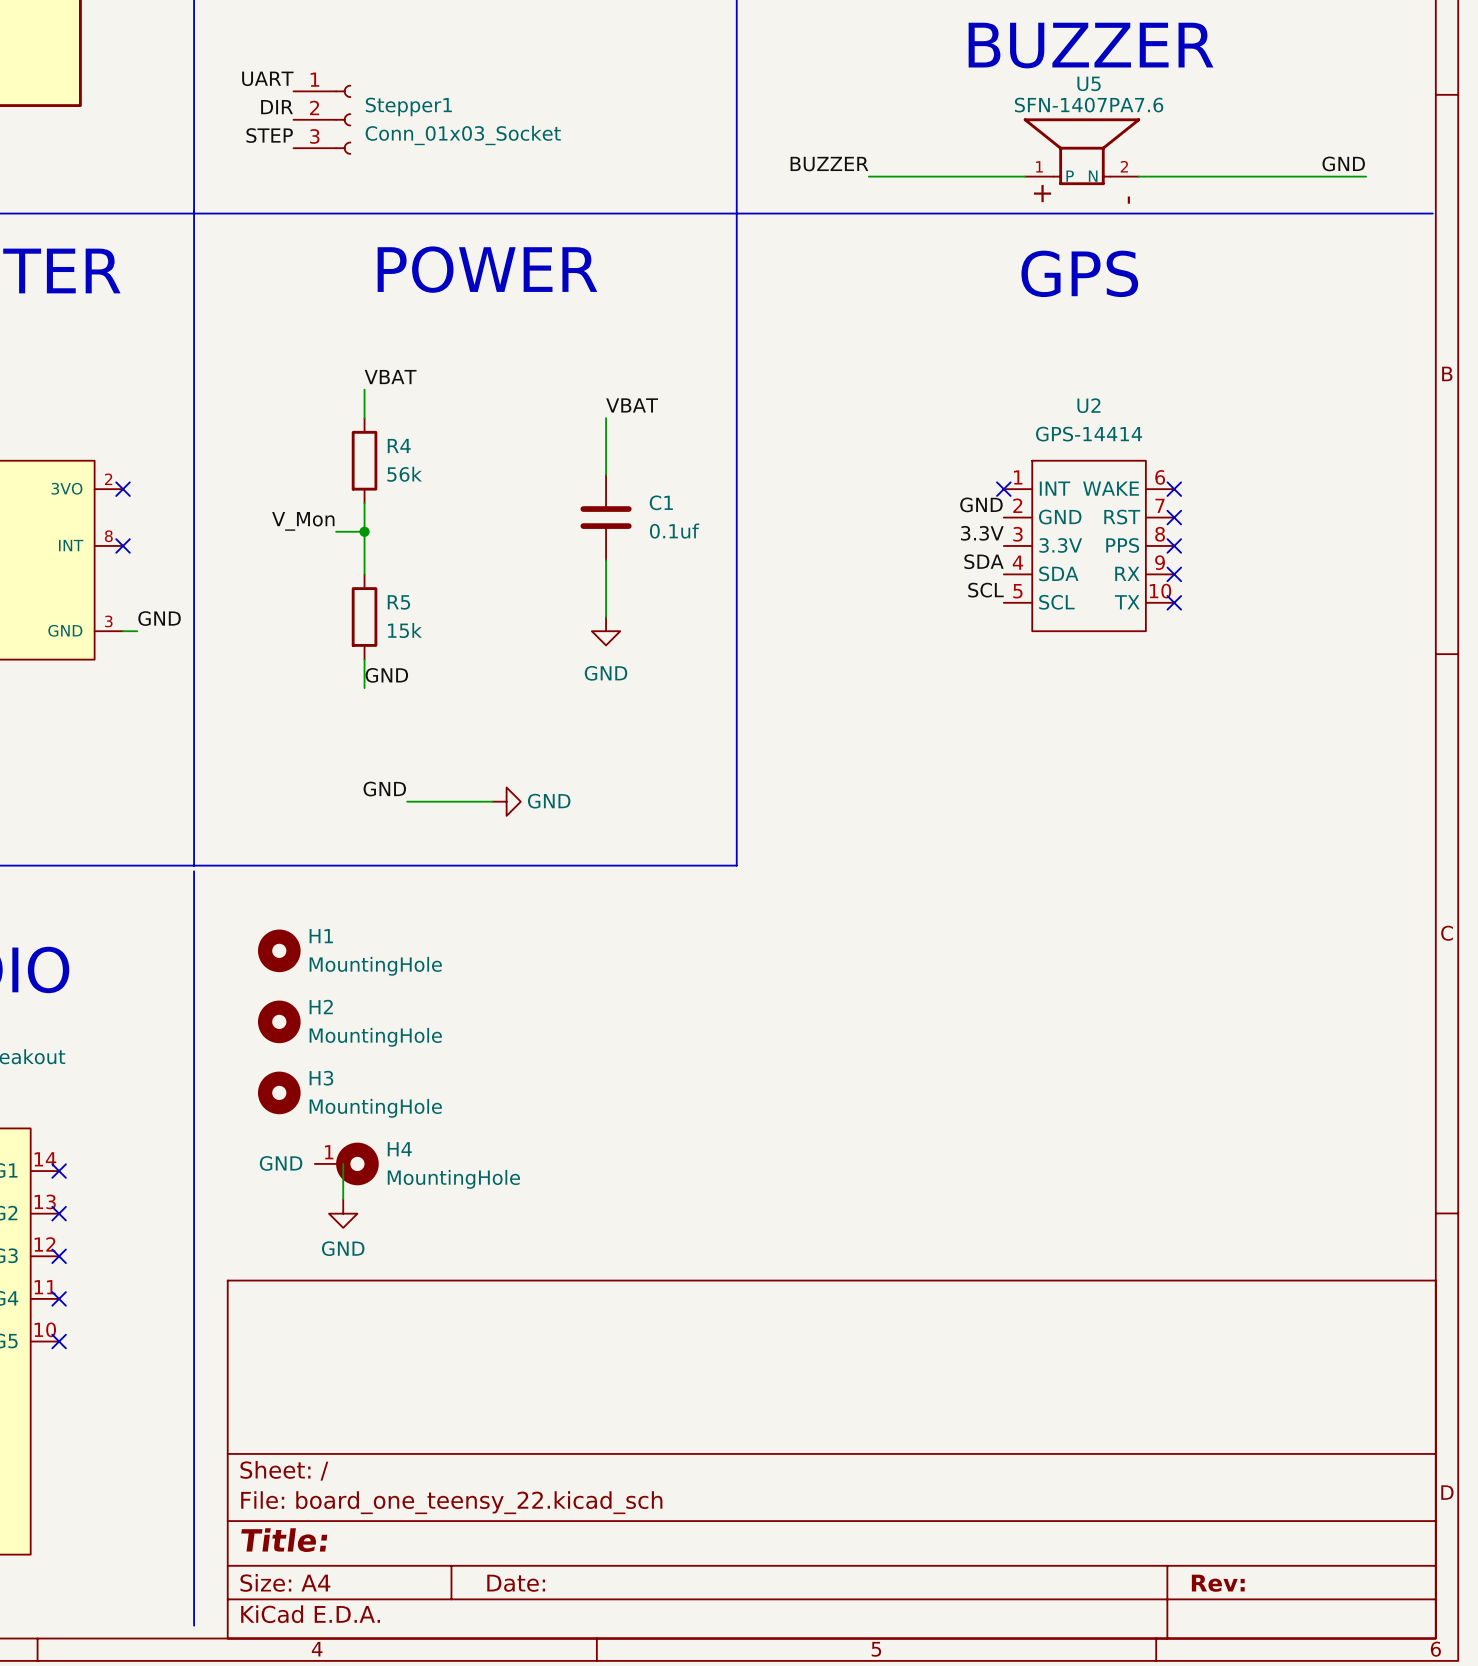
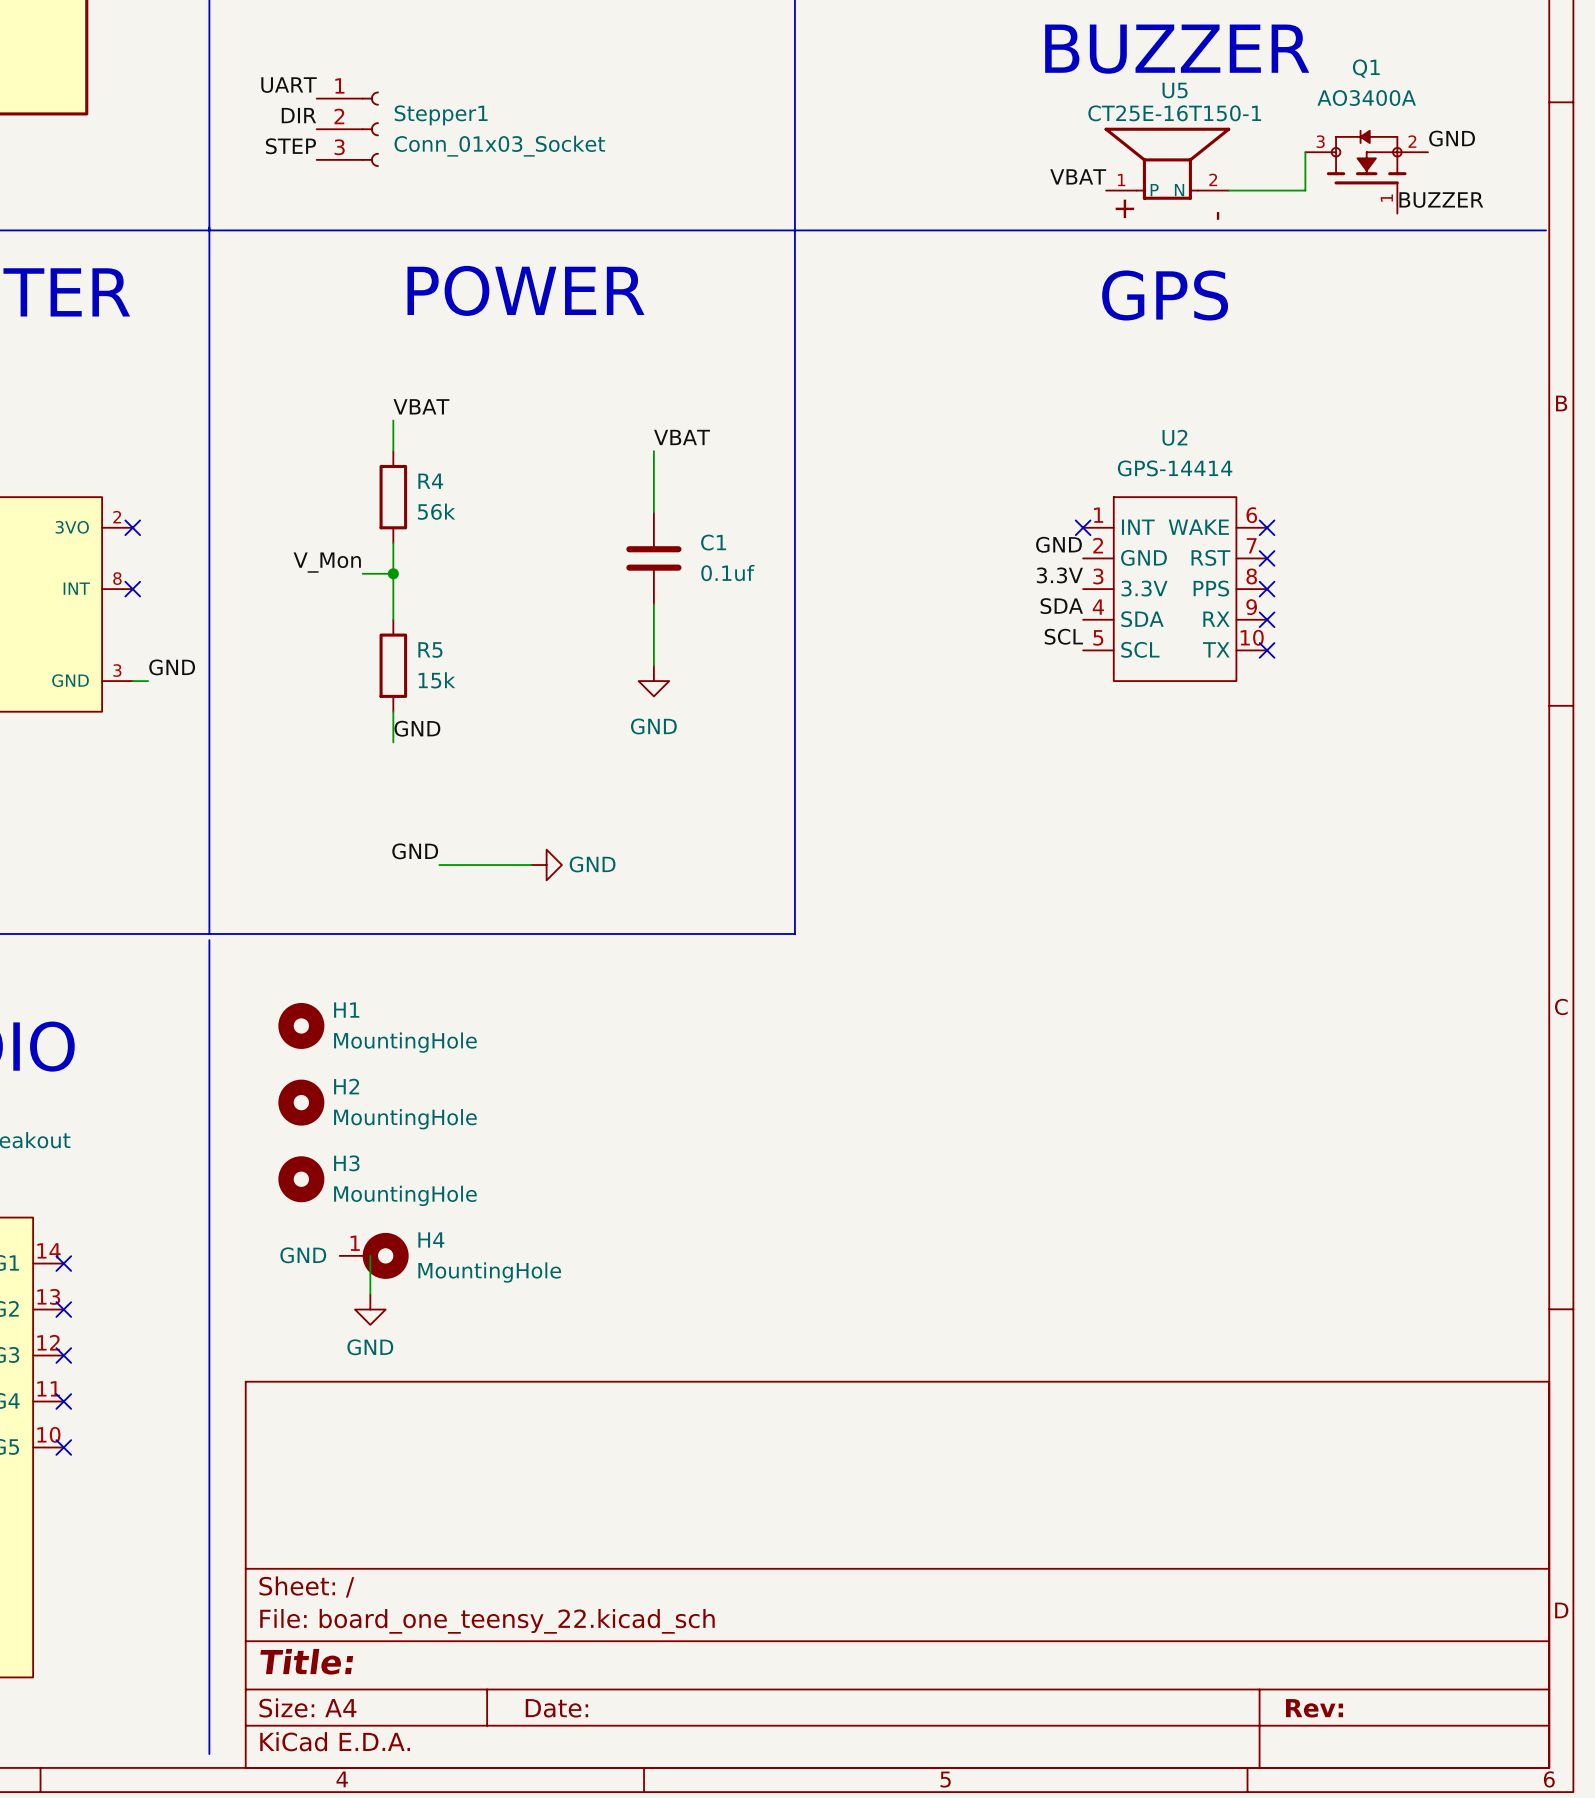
U5 value: SFN-1407PA7.6 (1089, 105) -> CT25E-16T150-1 (1174, 113)
Q1: none -> AO3400A (1366, 171)
label: none -> VBAT (1078, 176)
label position: GND (1343, 163) -> GND (1452, 138)
label: BUZZER (829, 164) -> none
wire: (868, 176) (1025, 176) -> none
wire: (1209, 176) (1366, 176) -> (1305, 190) (1305, 152)
label: none -> BUZZER (1441, 200)

